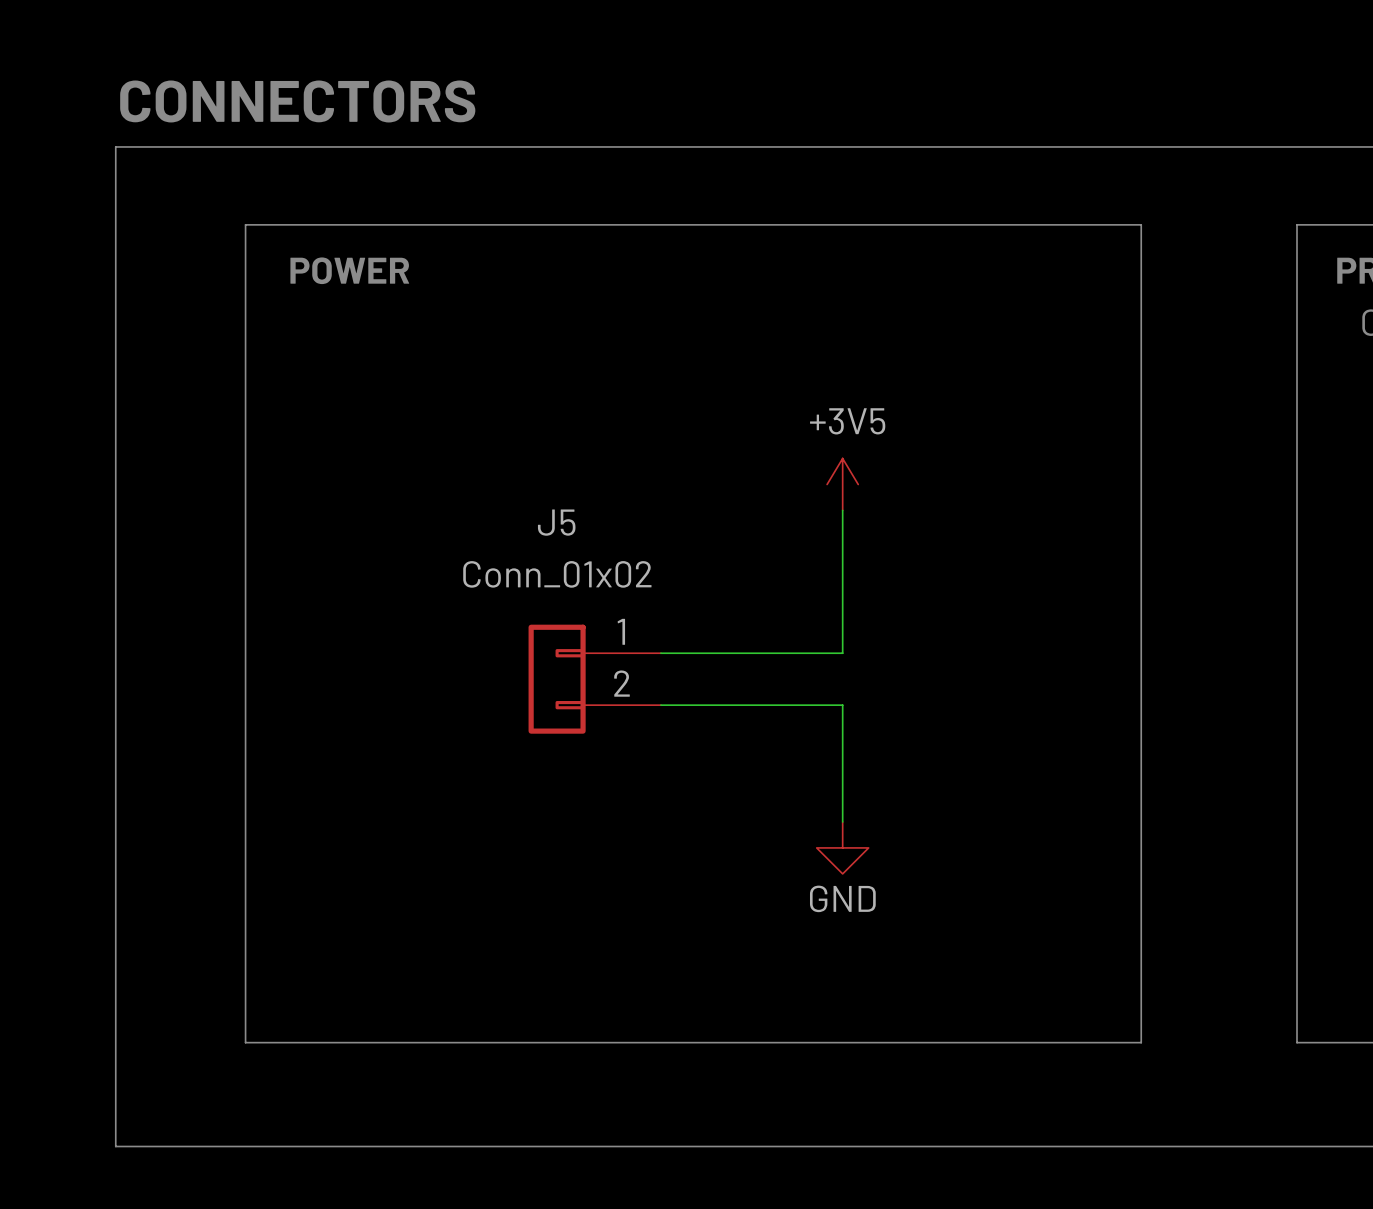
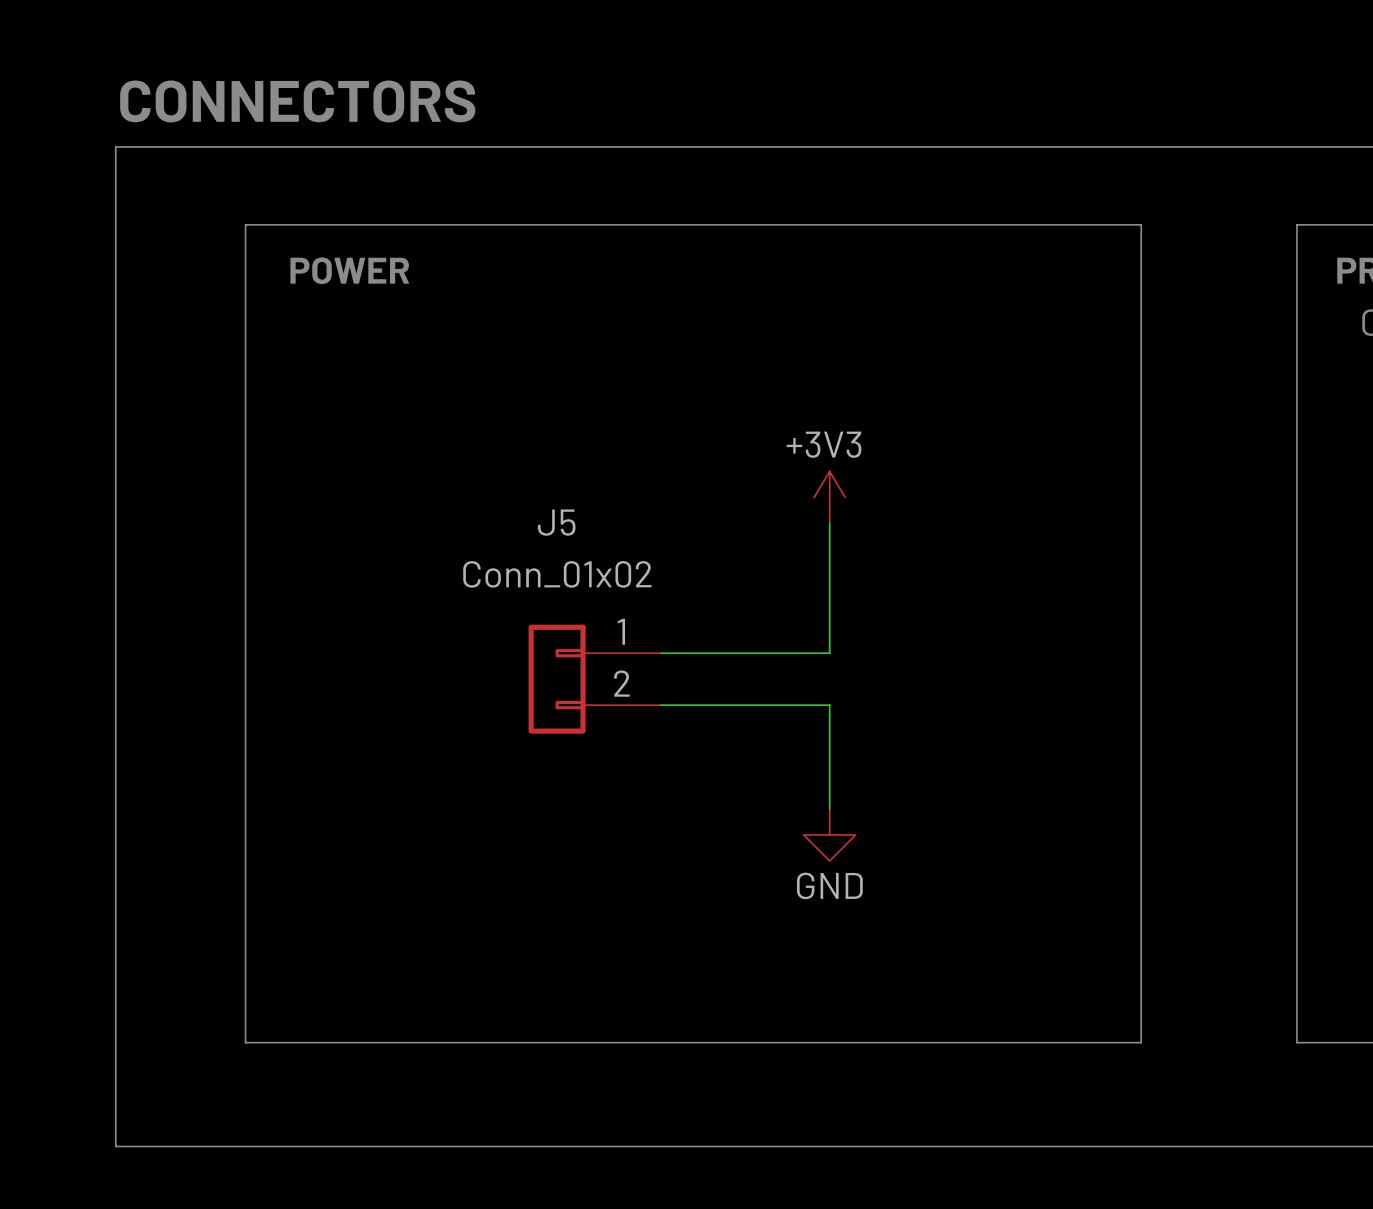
power symbol: +3V5 (842, 484) -> +3V3 (829, 497)
wire: (842, 510) (842, 653) (829, 653) -> (829, 523) (829, 653)
wire: (829, 705) (842, 705) (842, 821) -> (829, 705) (829, 808)
power symbol position: GND (842, 847) -> GND (829, 834)

